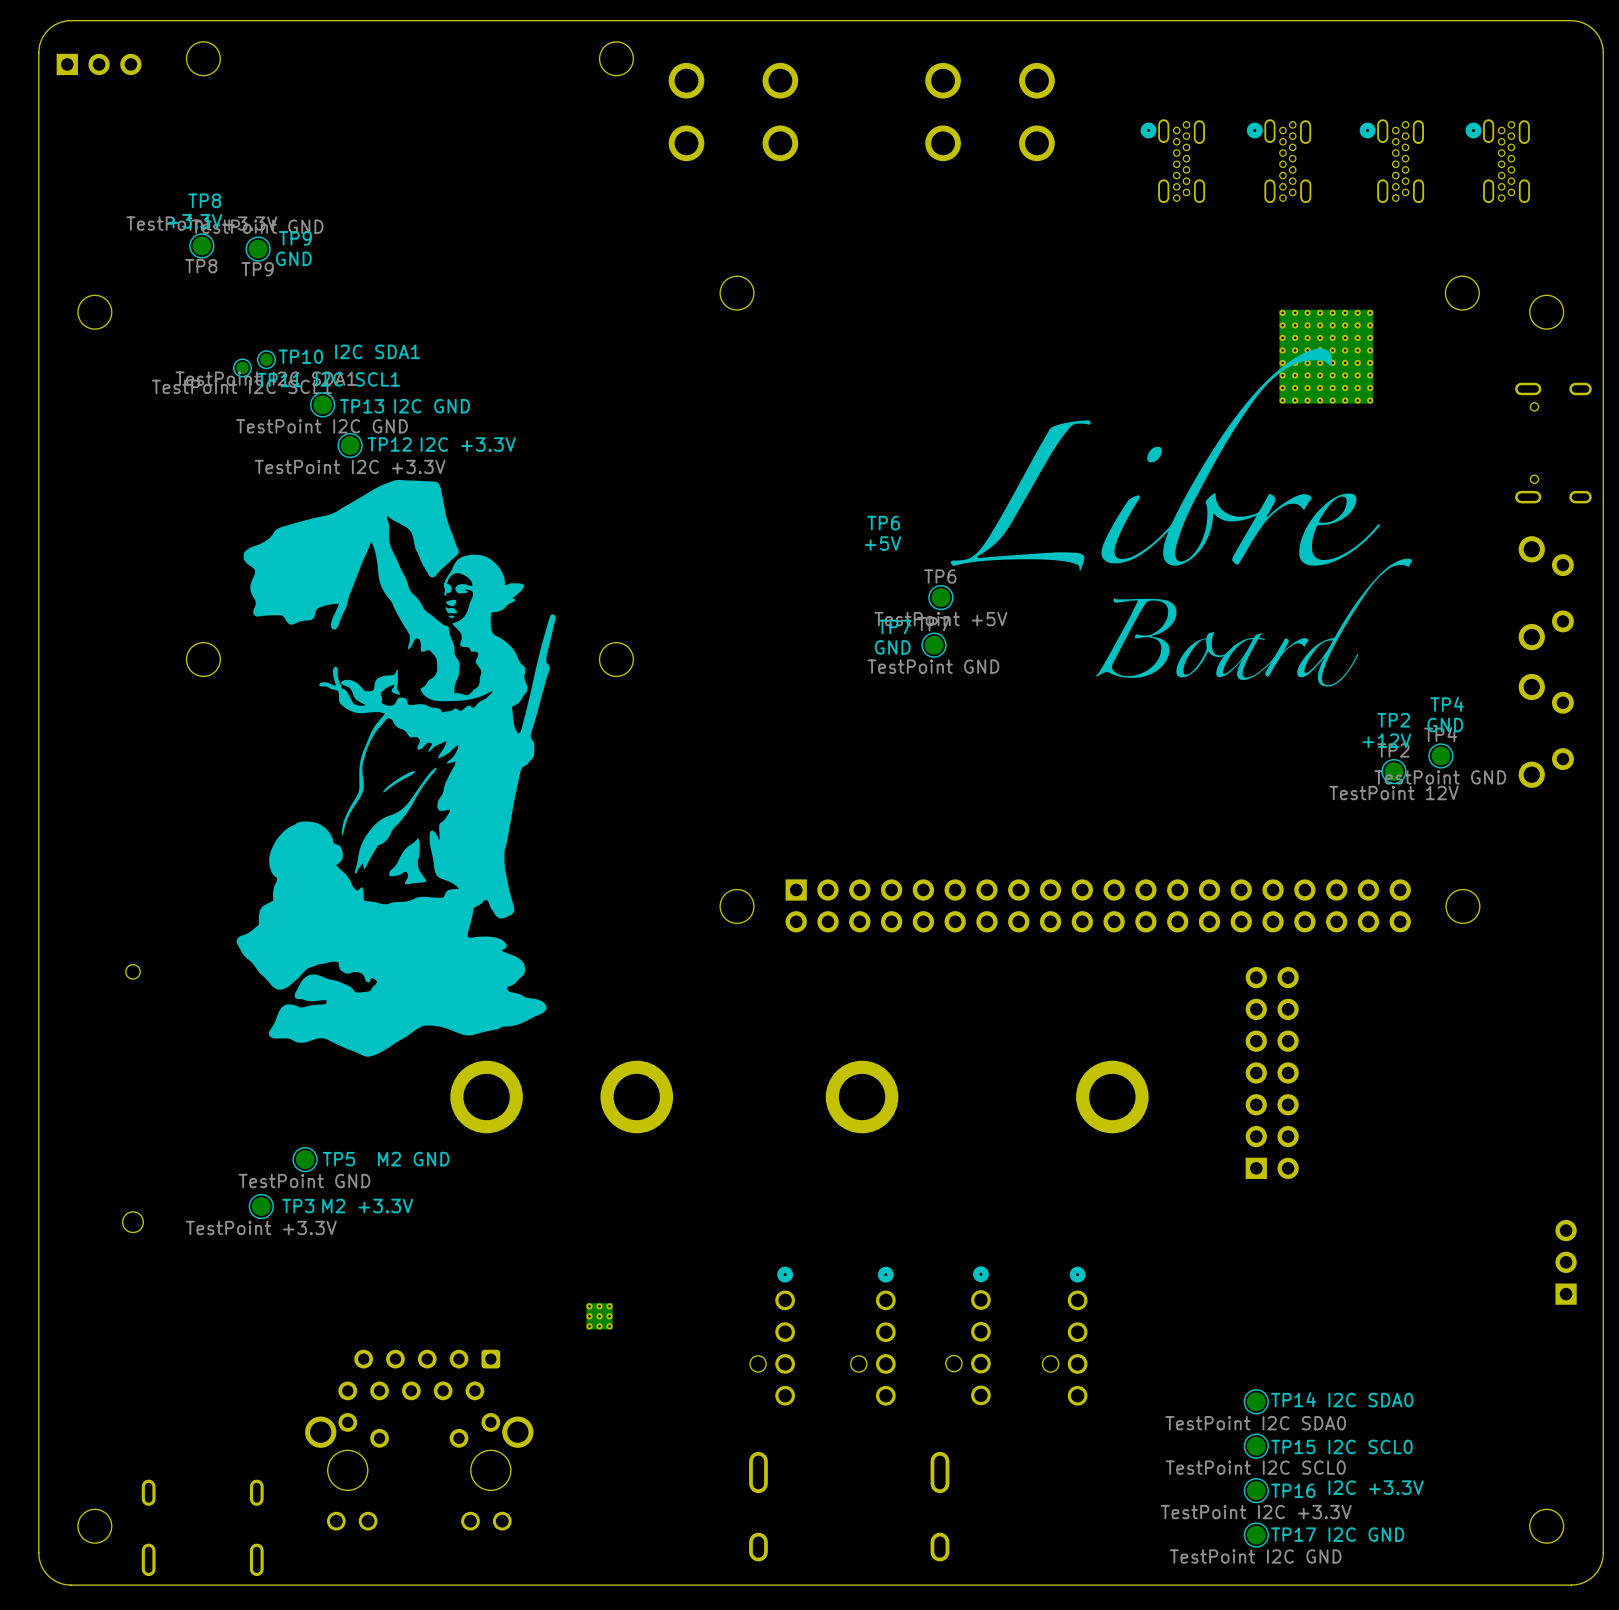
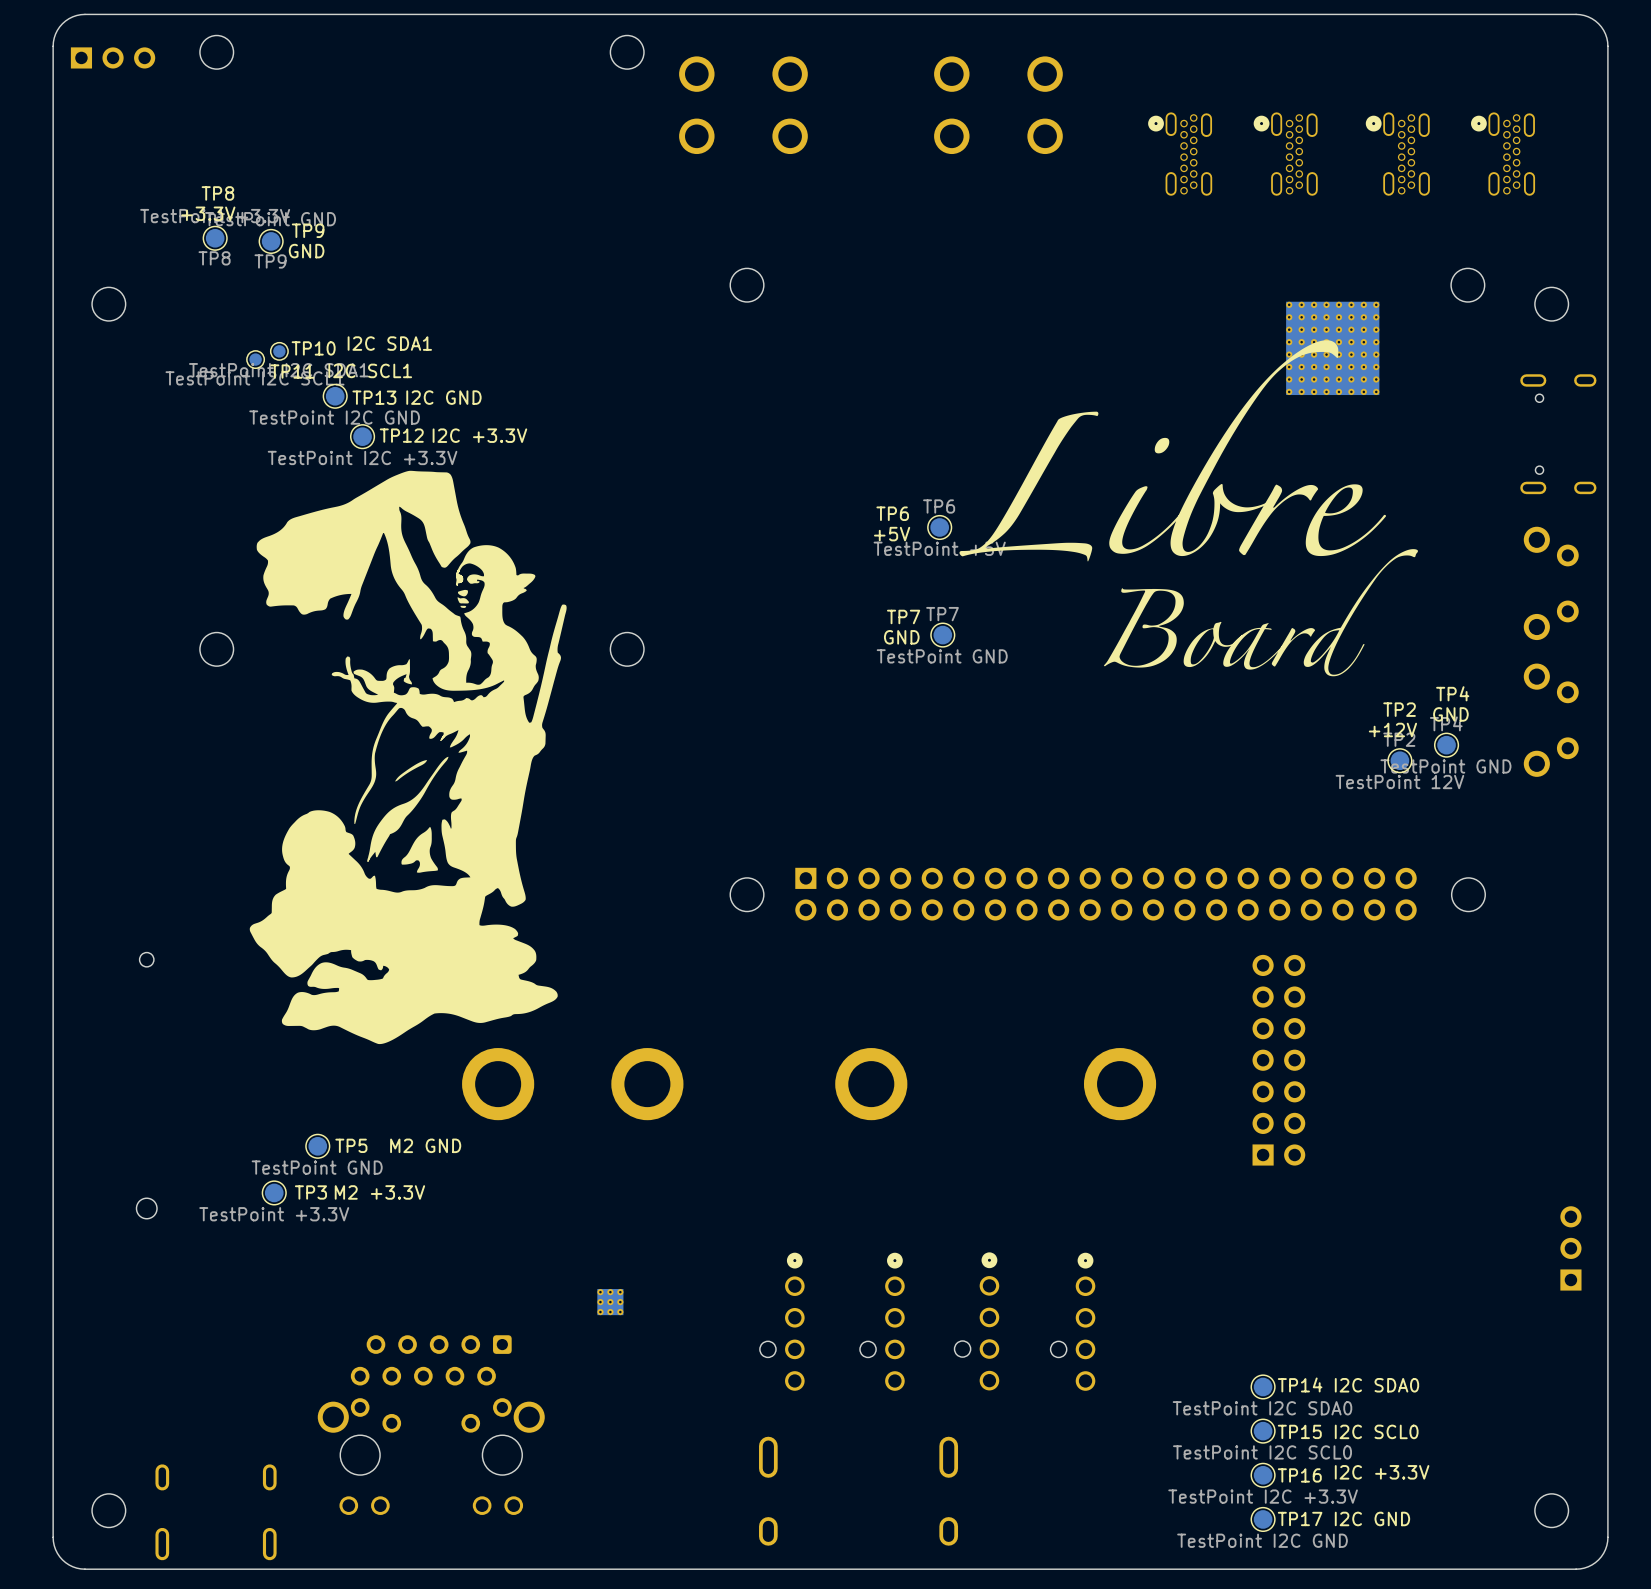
TP6 position: (940, 597) -> (939, 527)

